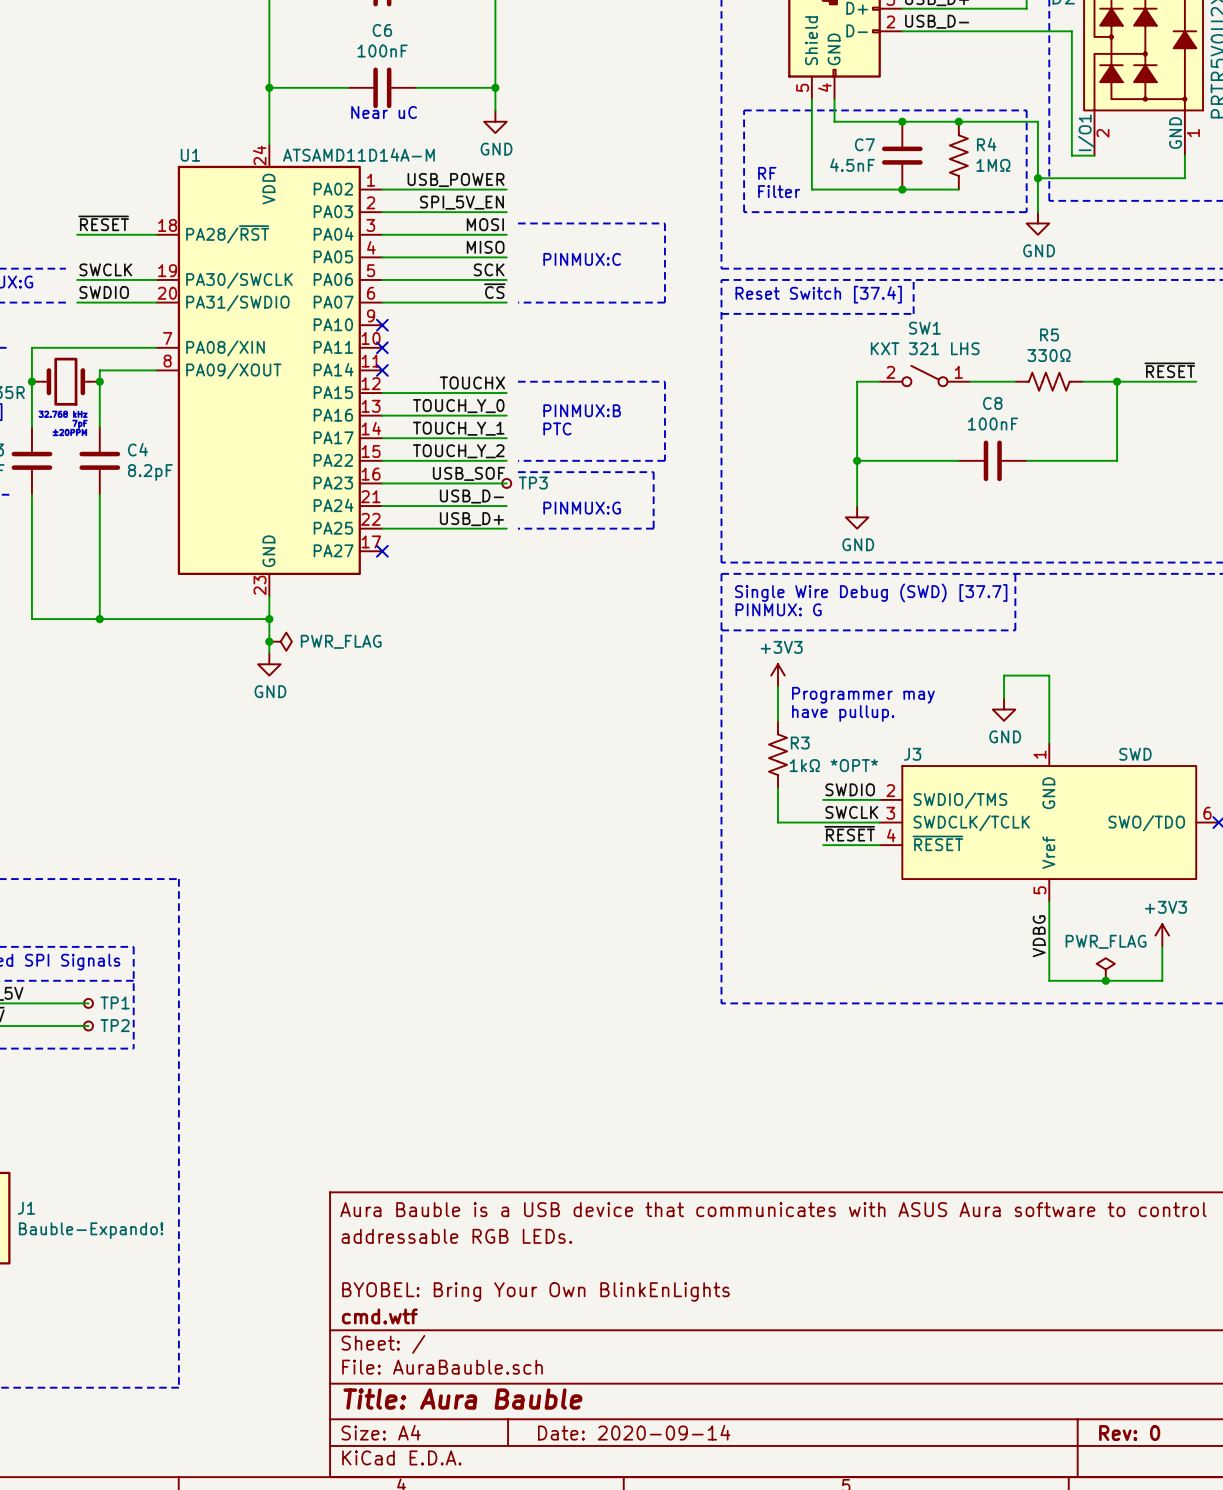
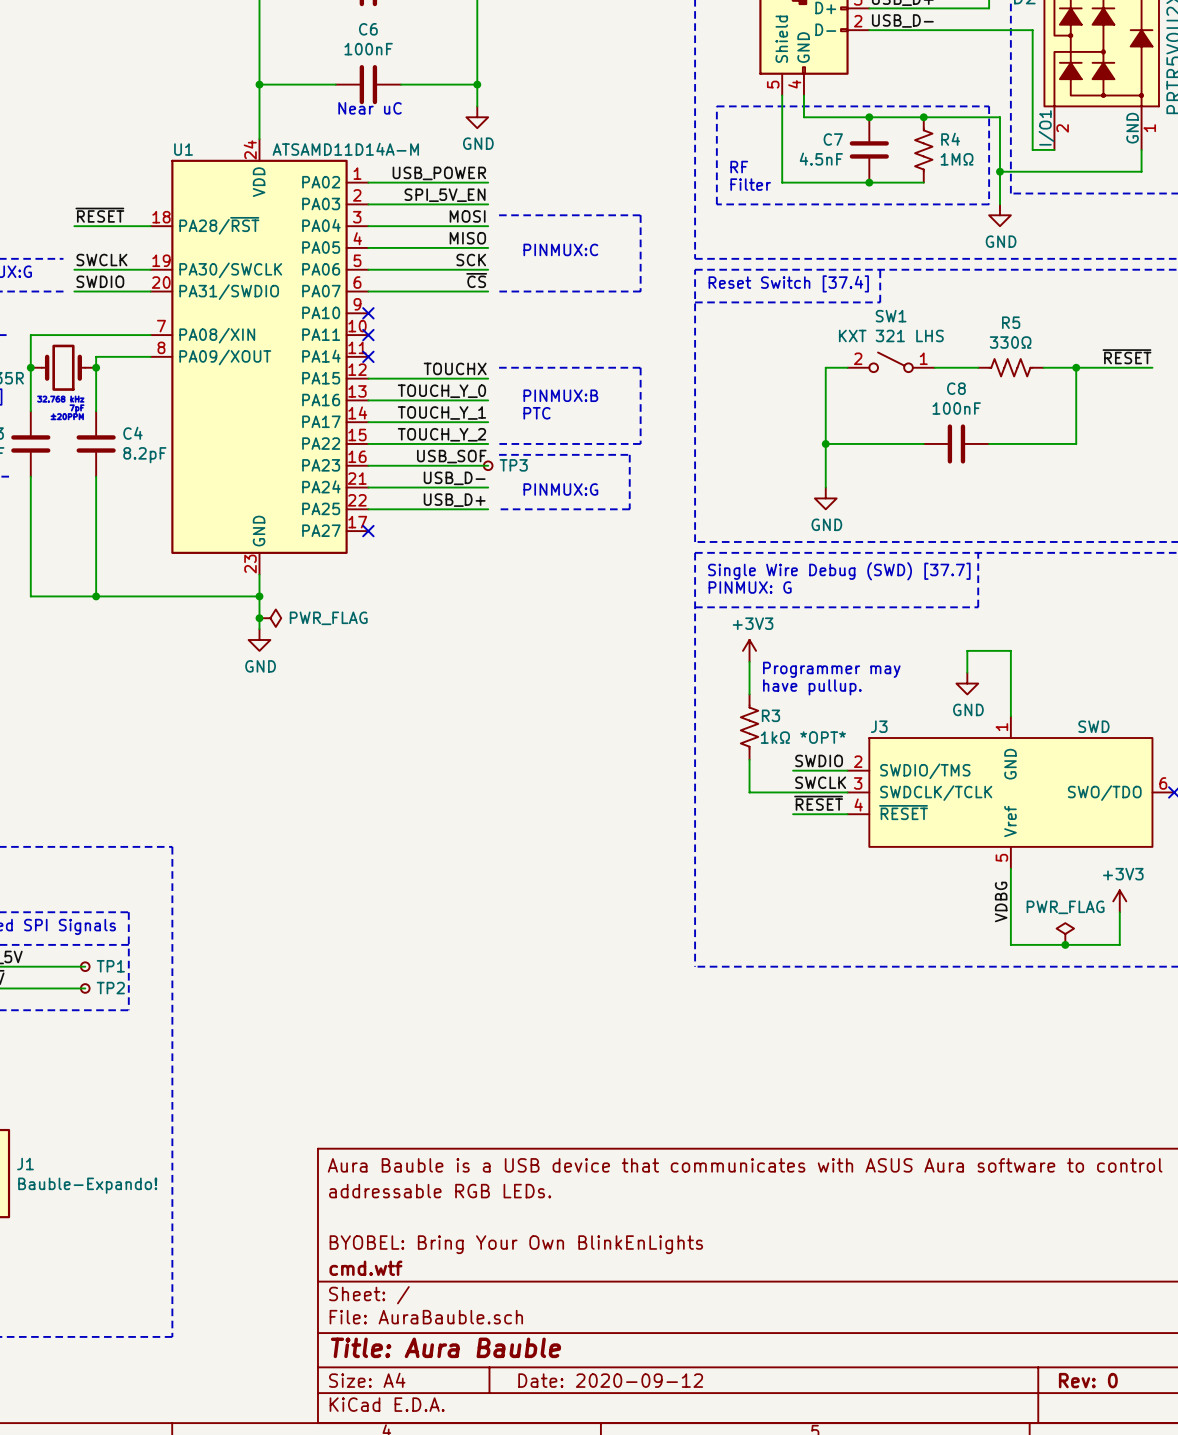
title block: Date: 2020-09-14 (634, 1432) -> Date: 2020-09-12 (610, 1380)

